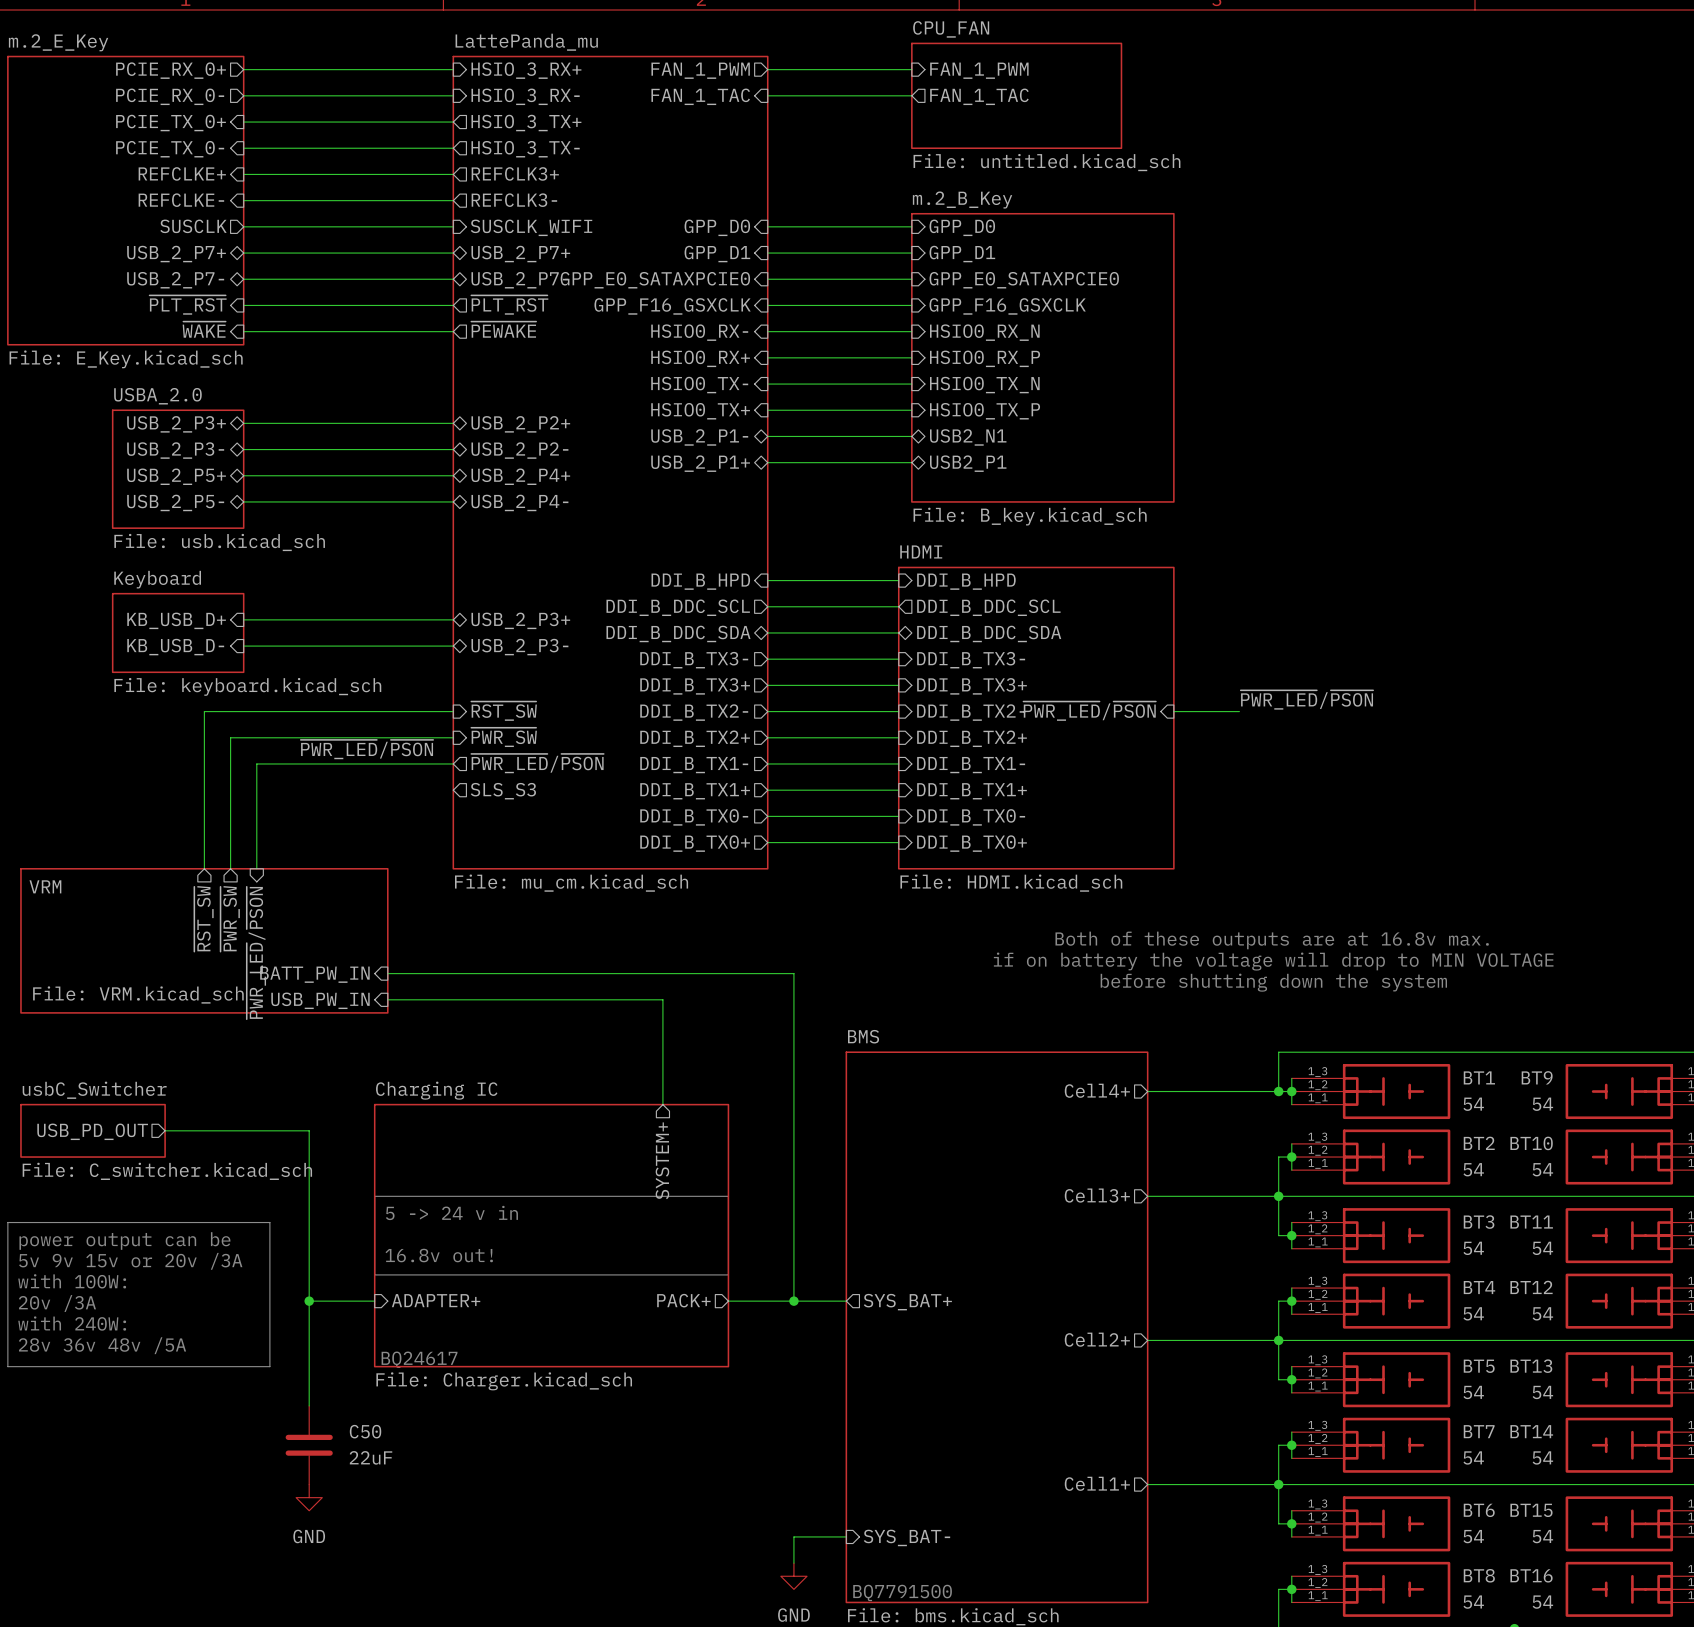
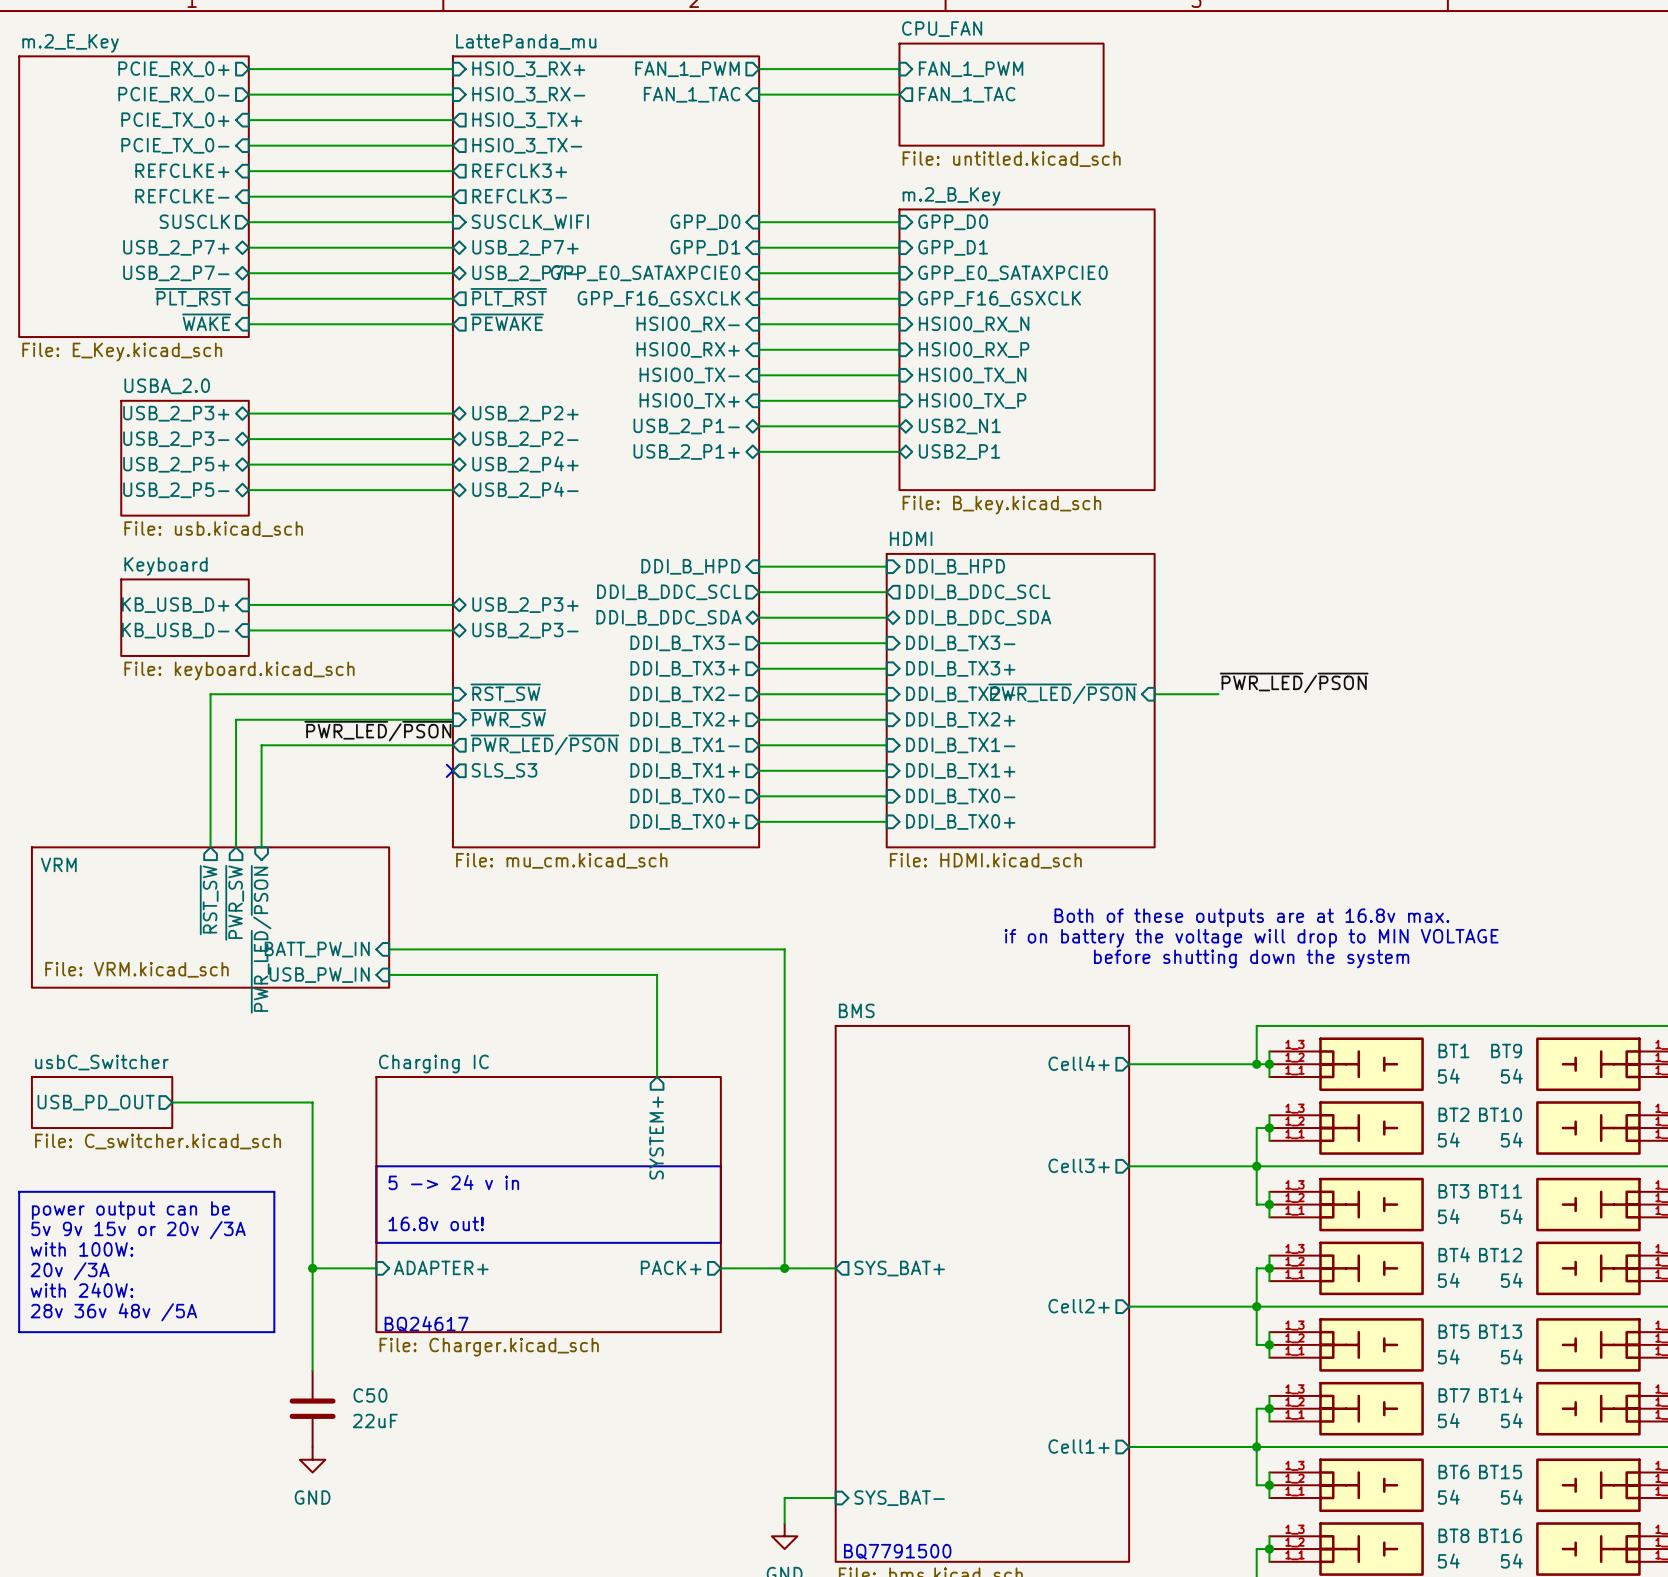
no-connect mark: none -> (452, 770)

